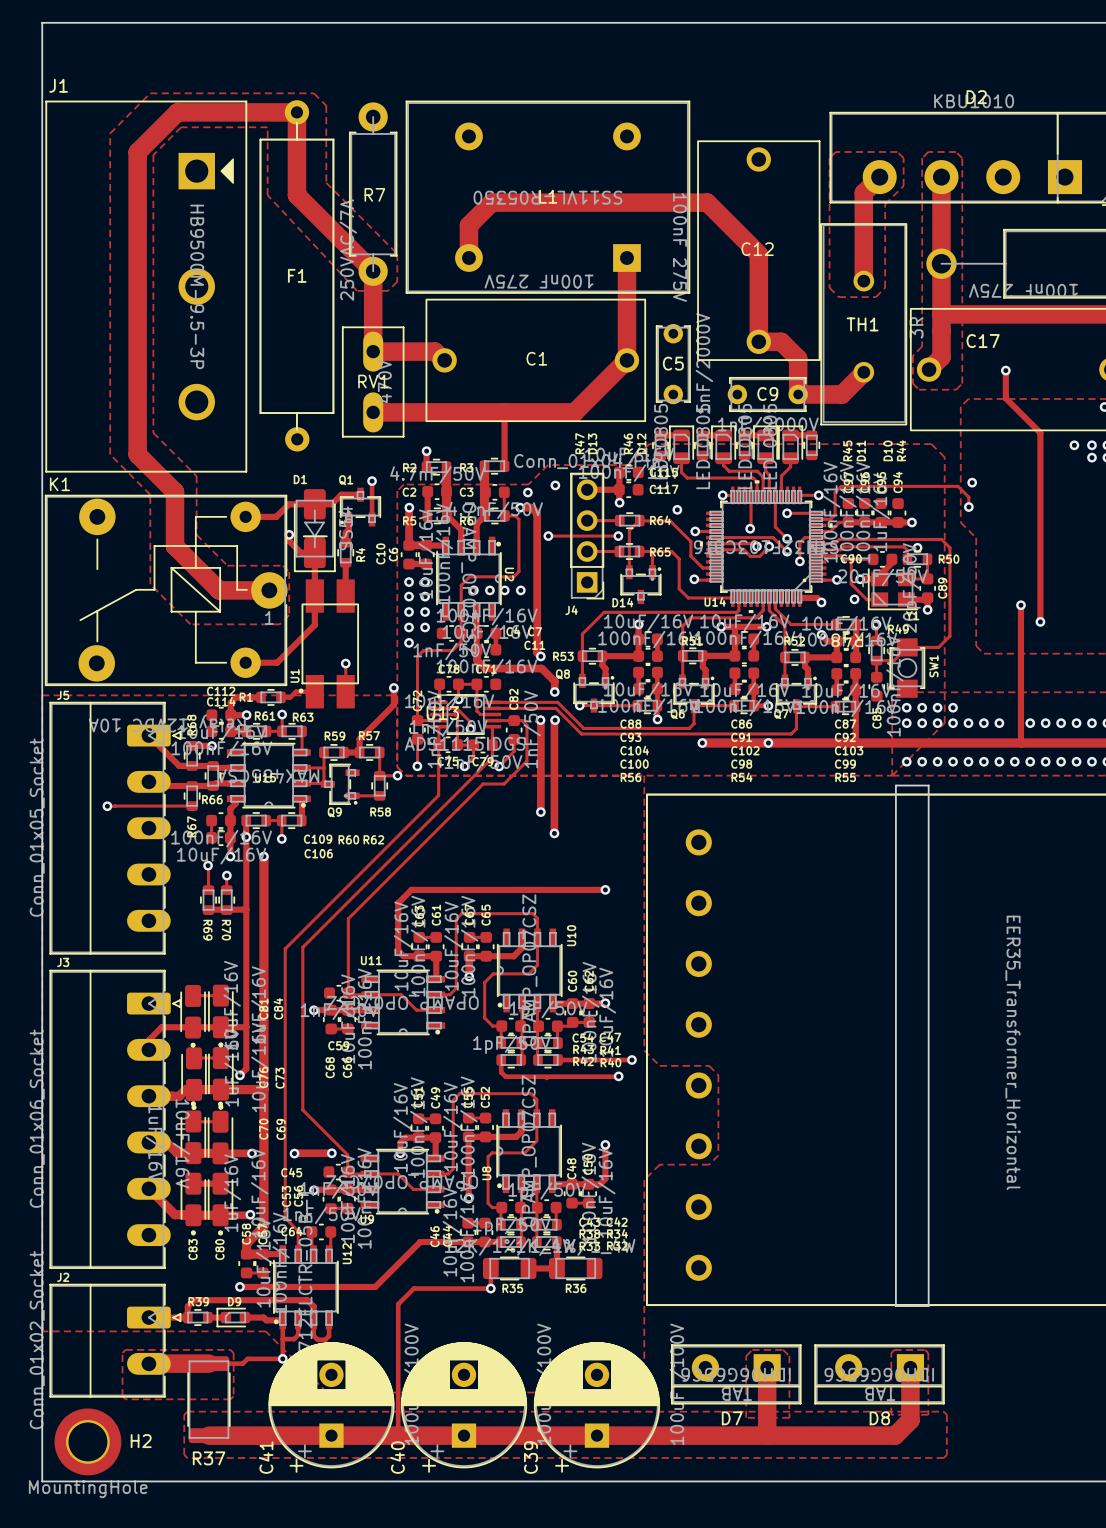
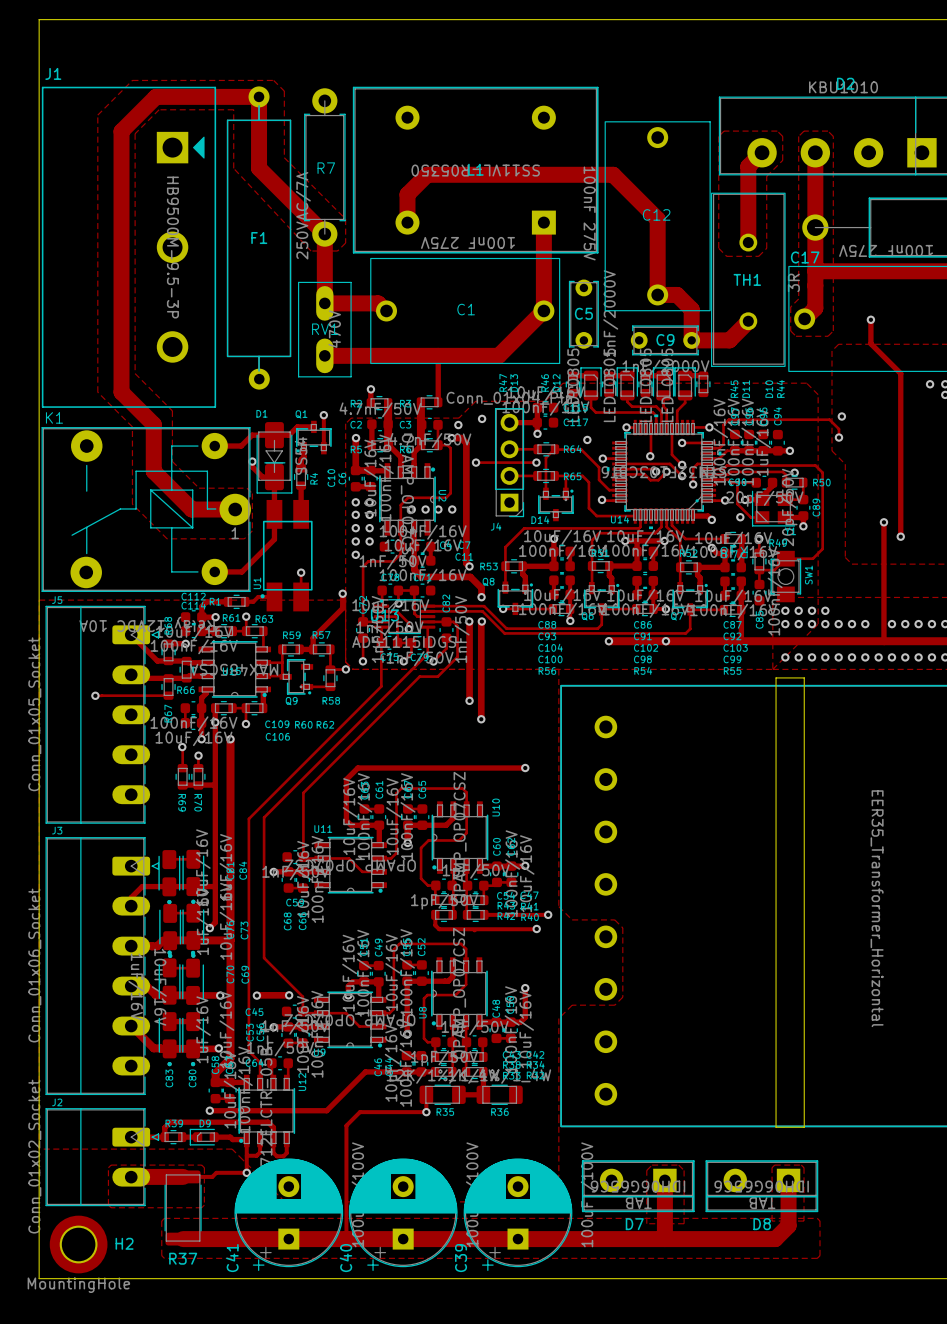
C17 name position: C17 (983, 341) -> C17 (805, 257)

